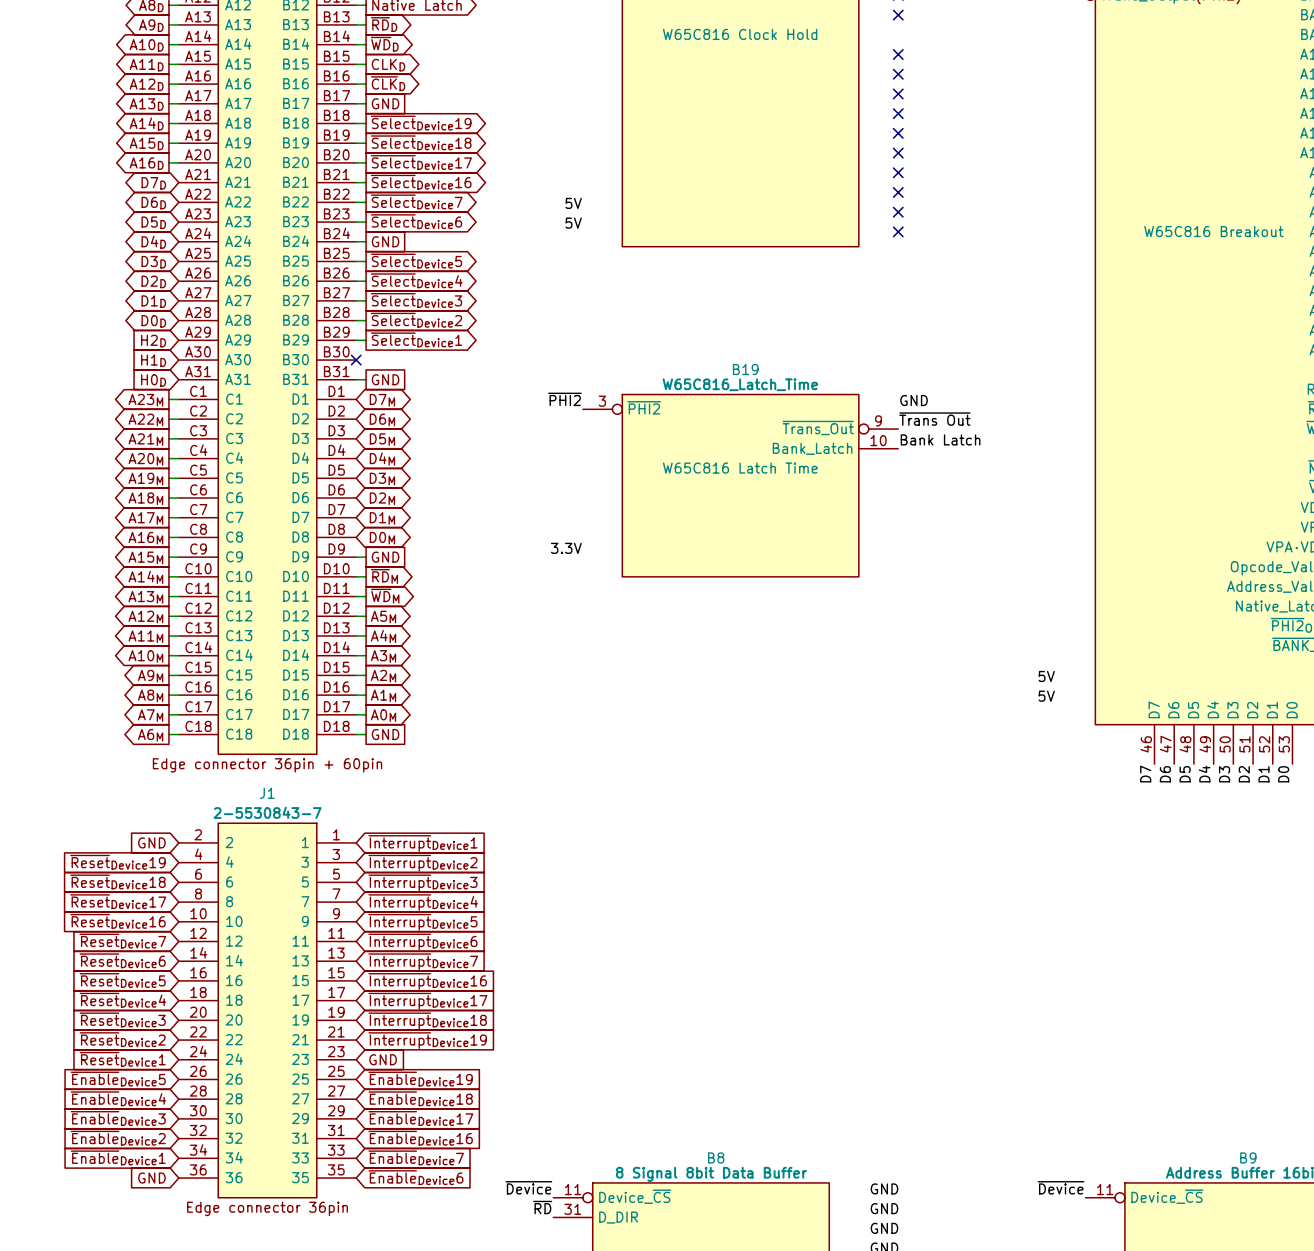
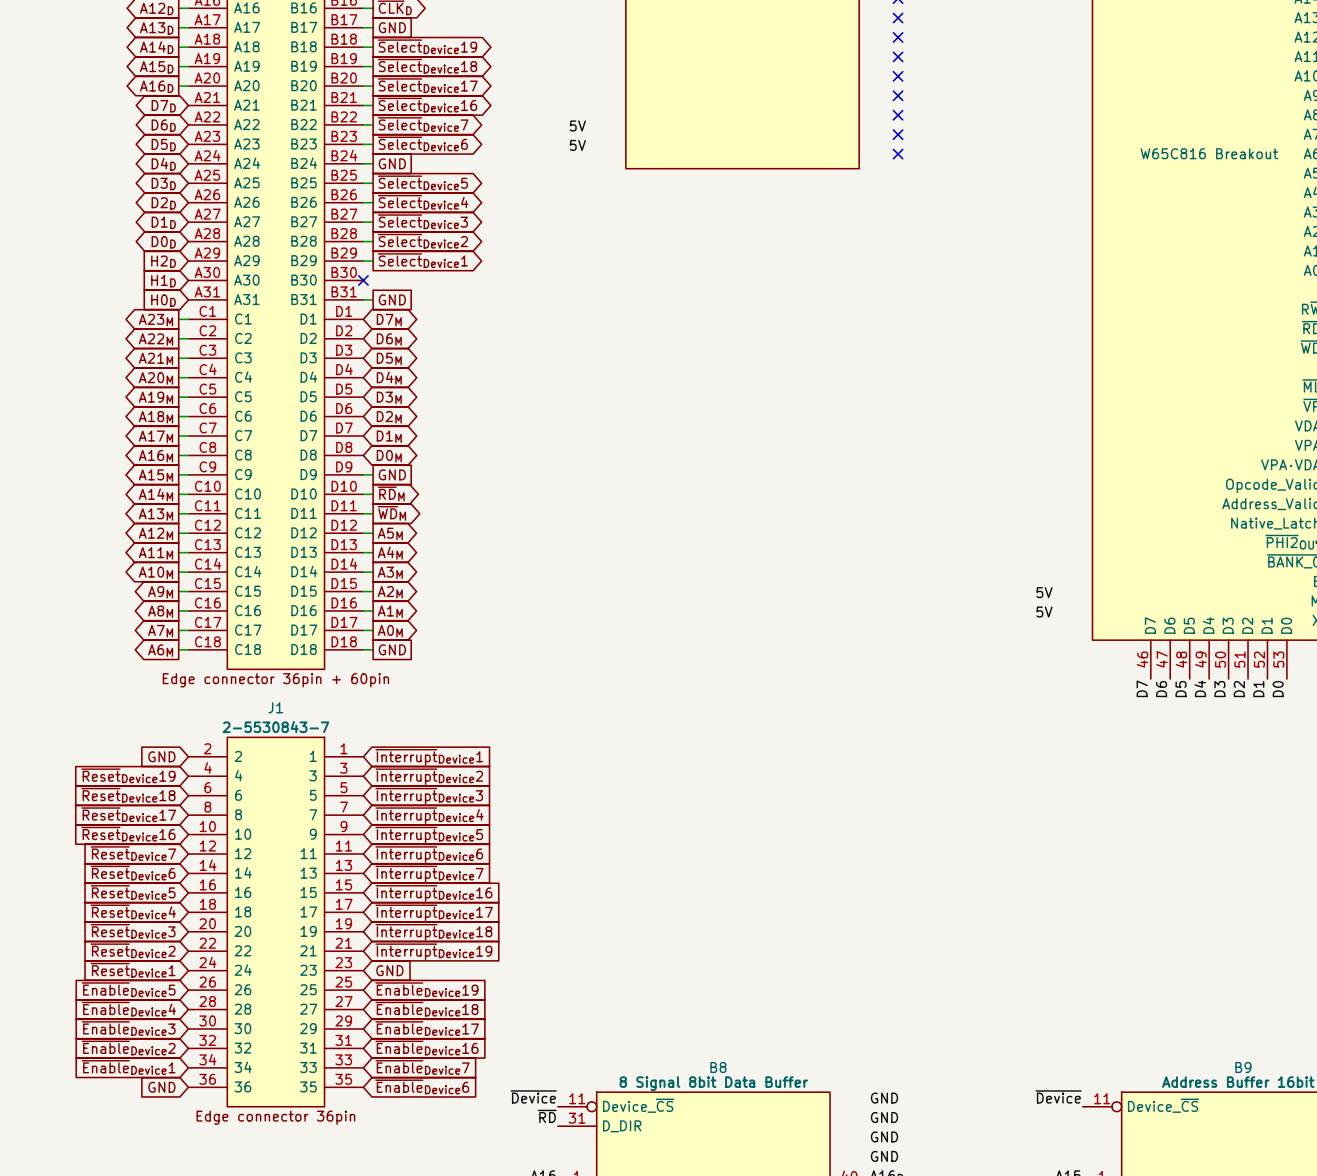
label: ~{PHI2} (564, 399) -> none
label: GND (914, 400) -> none
label: ~{Trans Out} (934, 419) -> none
label: Bank Latch (940, 439) -> none
B19: W65C816_Latch_Time (740, 485) -> none
label: 3.3V (566, 548) -> none

